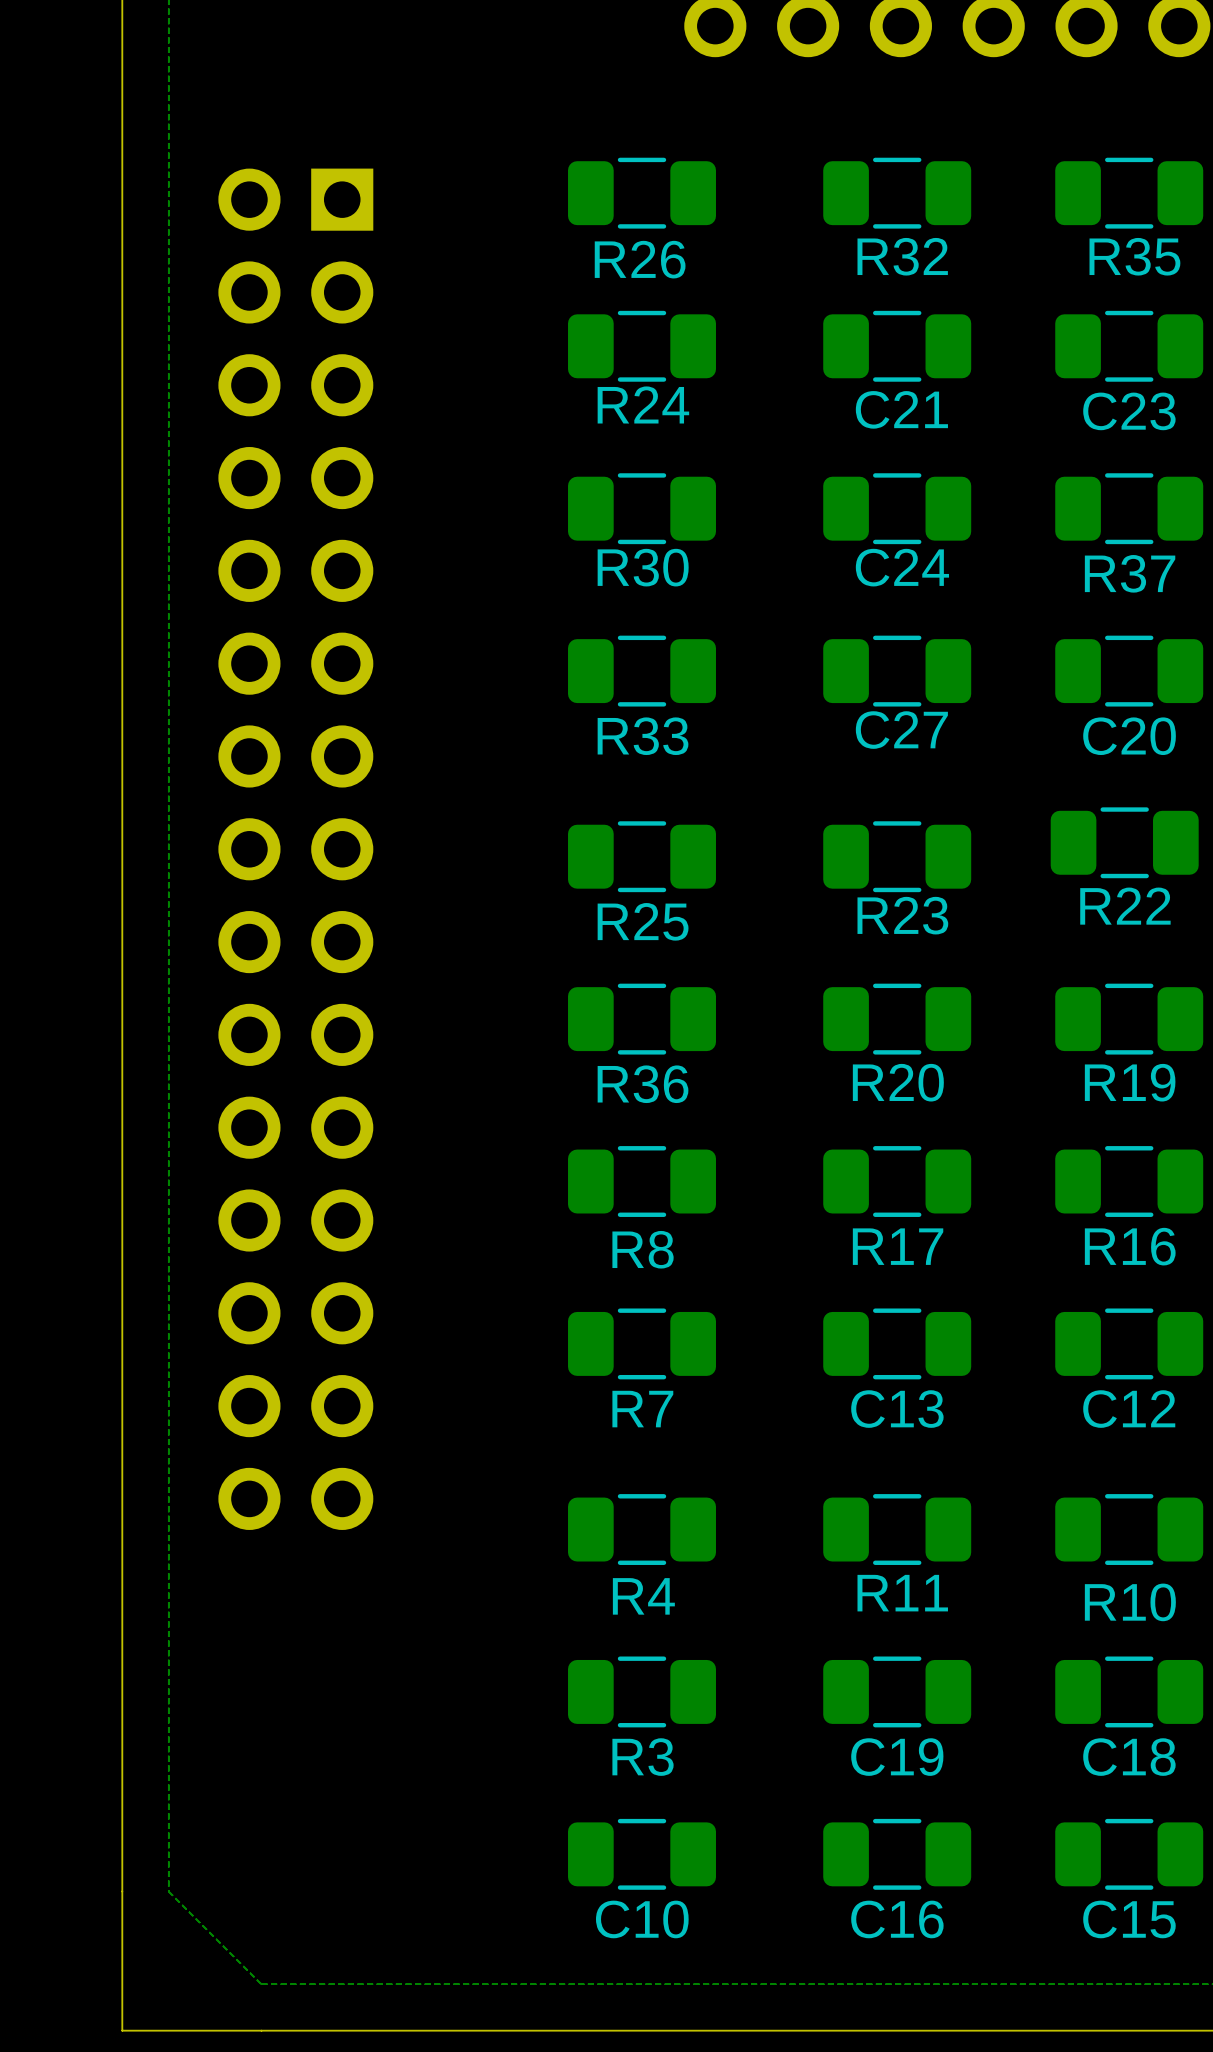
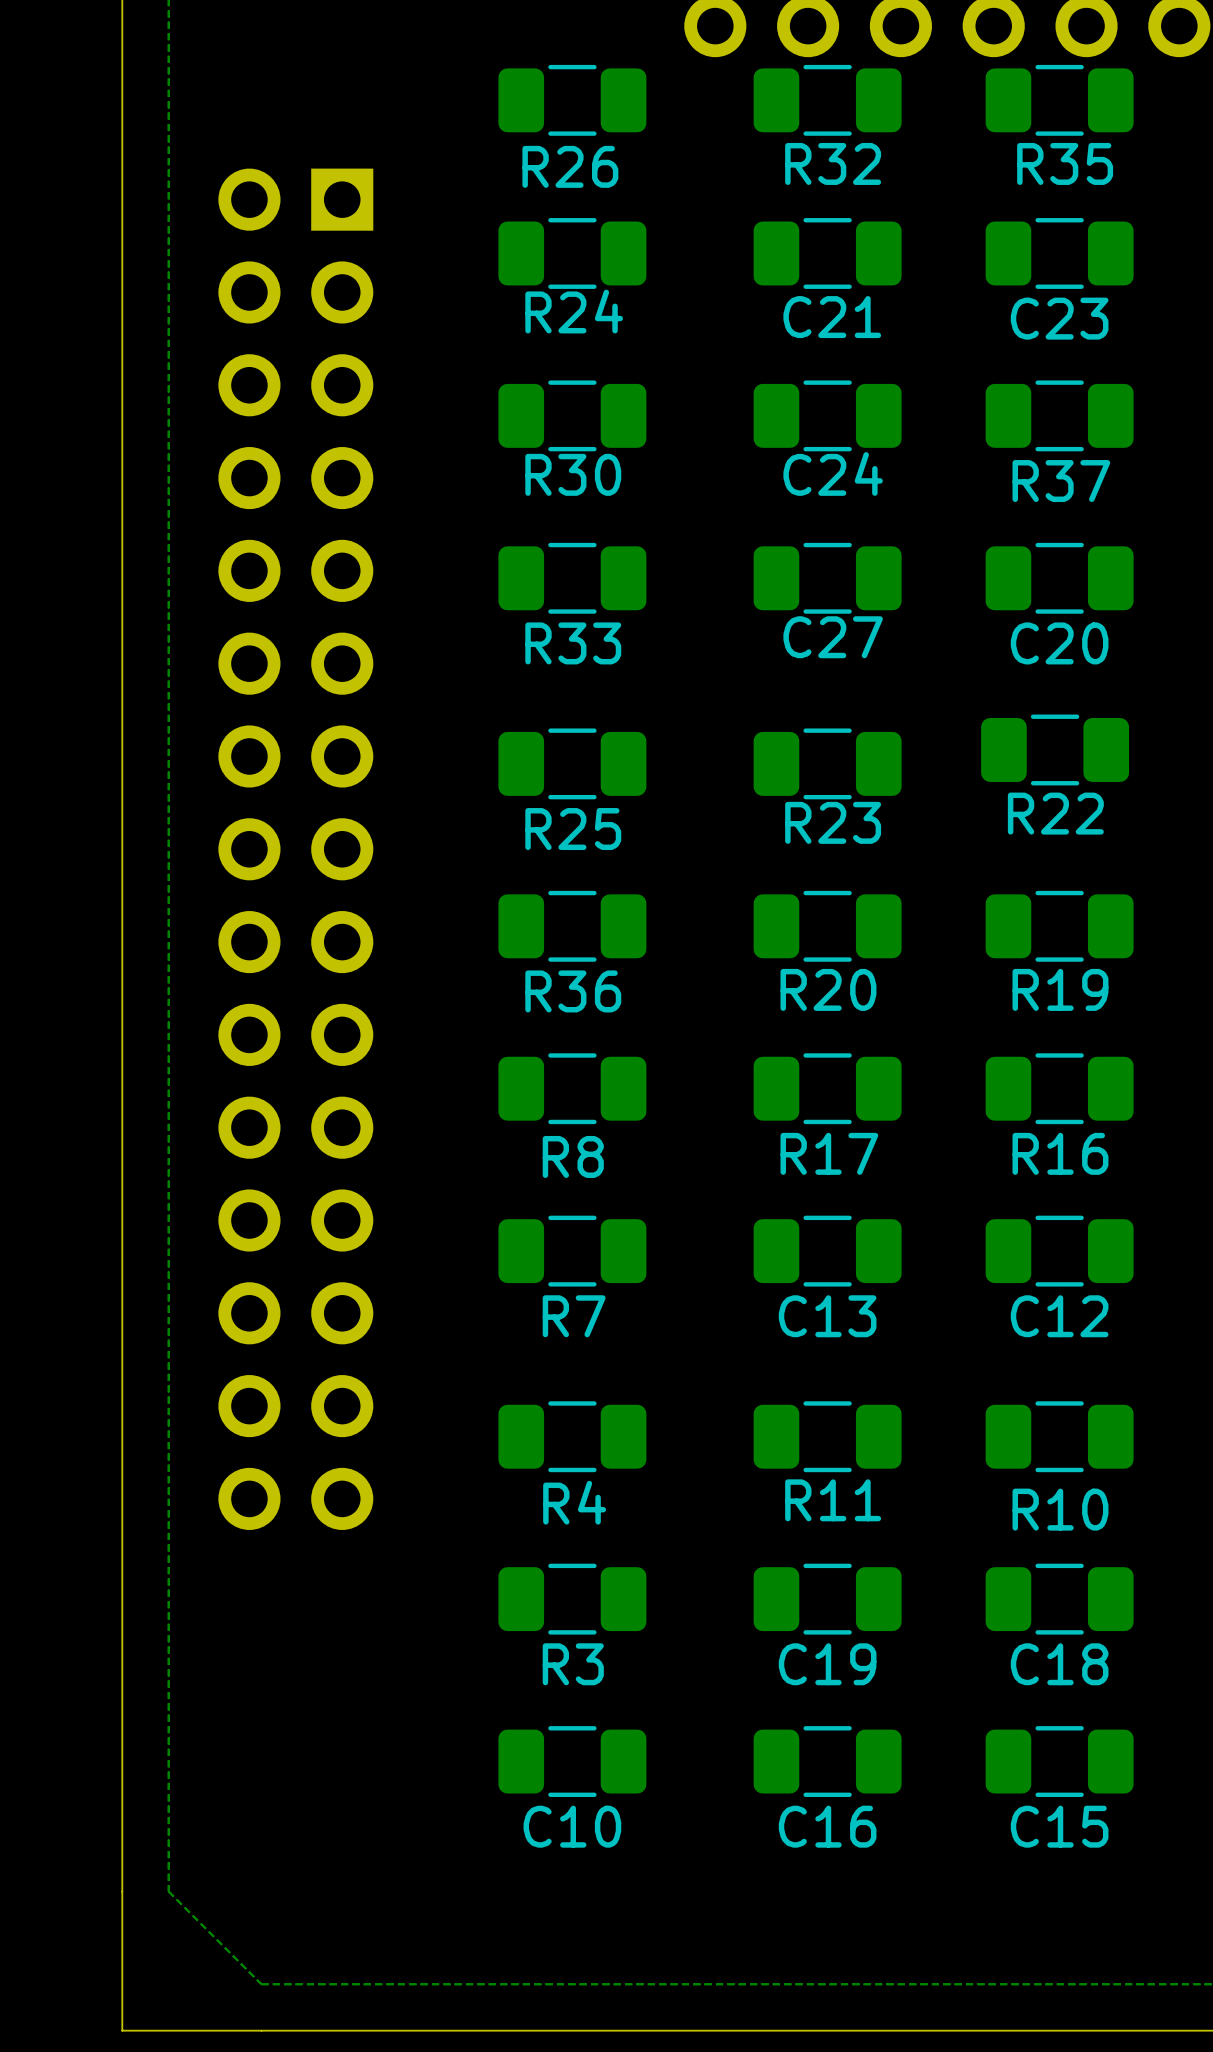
R26 position: (642, 193) -> (572, 100)
R32 position: (897, 193) -> (827, 100)
R35 position: (1129, 193) -> (1059, 100)
R24 position: (642, 346) -> (572, 253)
C21 position: (897, 346) -> (827, 253)
C23 position: (1129, 346) -> (1059, 253)
R30 position: (642, 508) -> (572, 415)
C24 position: (897, 508) -> (827, 415)
R37 position: (1129, 508) -> (1059, 415)
R33 position: (642, 671) -> (572, 578)
C27 position: (897, 671) -> (827, 578)
C20 position: (1129, 671) -> (1059, 578)
R22 position: (1124, 842) -> (1055, 749)
R25 position: (642, 856) -> (572, 763)
R23 position: (897, 856) -> (827, 763)
R36 position: (642, 1019) -> (572, 926)
R20 position: (897, 1019) -> (827, 926)
R19 position: (1129, 1019) -> (1059, 926)
R8 position: (642, 1181) -> (572, 1088)
R17 position: (897, 1181) -> (827, 1088)
R16 position: (1129, 1181) -> (1059, 1088)
R7 position: (642, 1343) -> (572, 1251)
C13 position: (897, 1343) -> (827, 1251)
C12 position: (1129, 1343) -> (1059, 1251)
R4 position: (642, 1529) -> (572, 1436)
R11 position: (897, 1529) -> (827, 1436)
R10 position: (1129, 1529) -> (1059, 1436)
R3 position: (642, 1691) -> (572, 1599)
C19 position: (897, 1691) -> (827, 1599)
C18 position: (1129, 1691) -> (1059, 1599)
C10 position: (642, 1854) -> (572, 1761)
C16 position: (897, 1854) -> (827, 1761)
C15 position: (1129, 1854) -> (1059, 1761)

